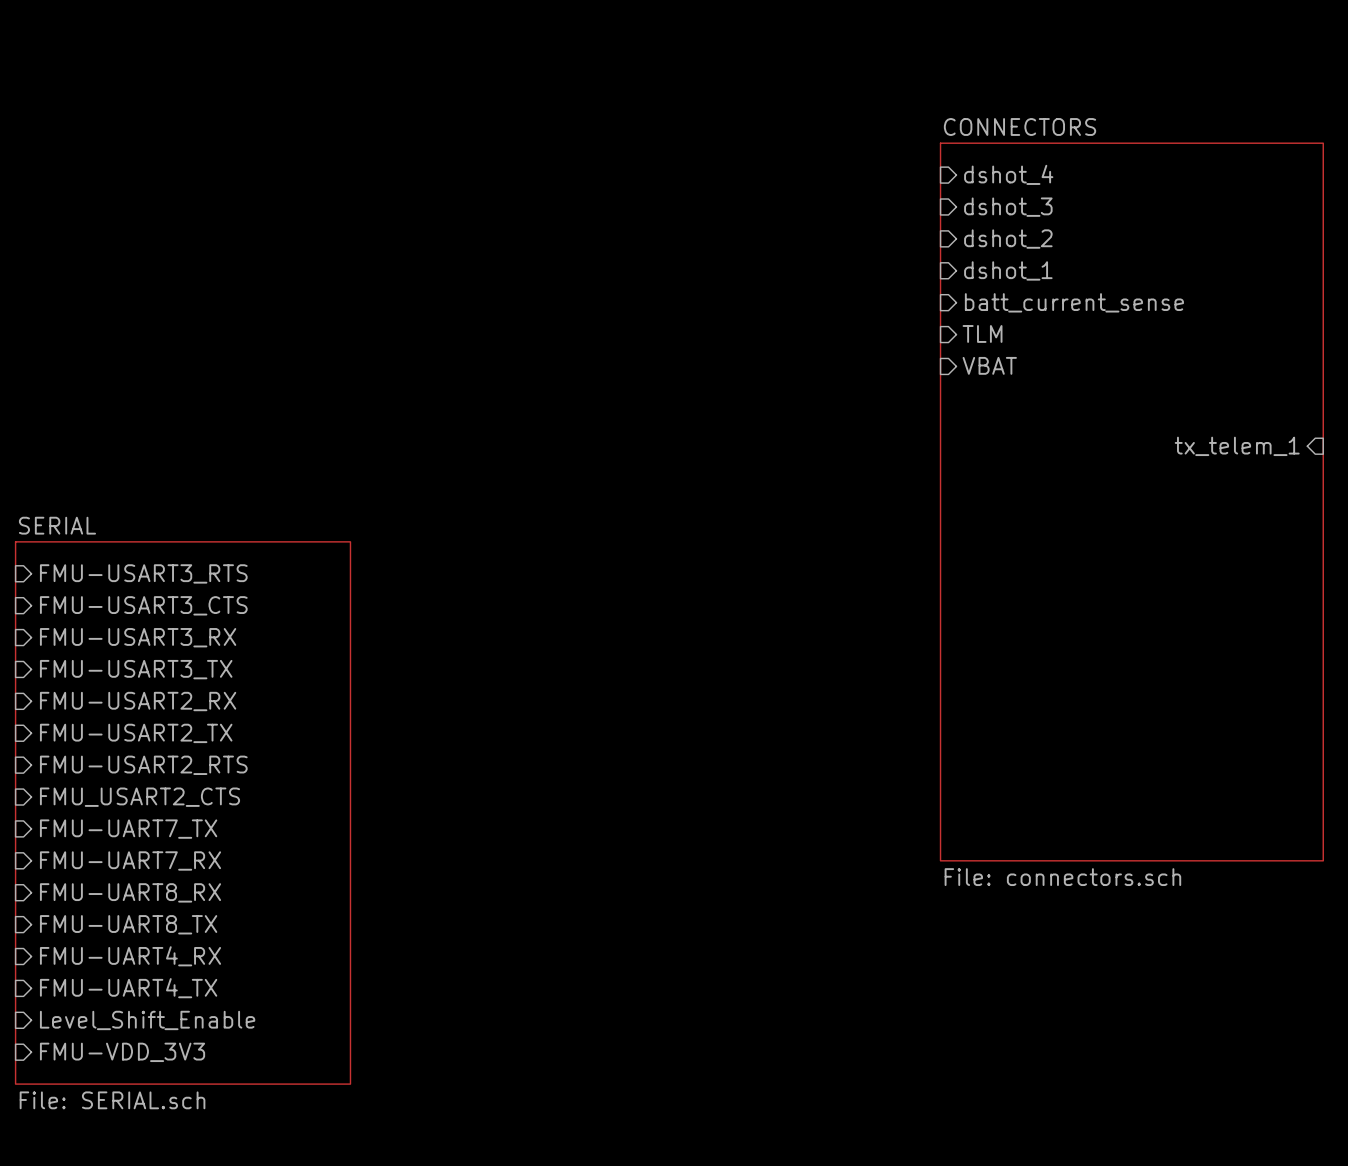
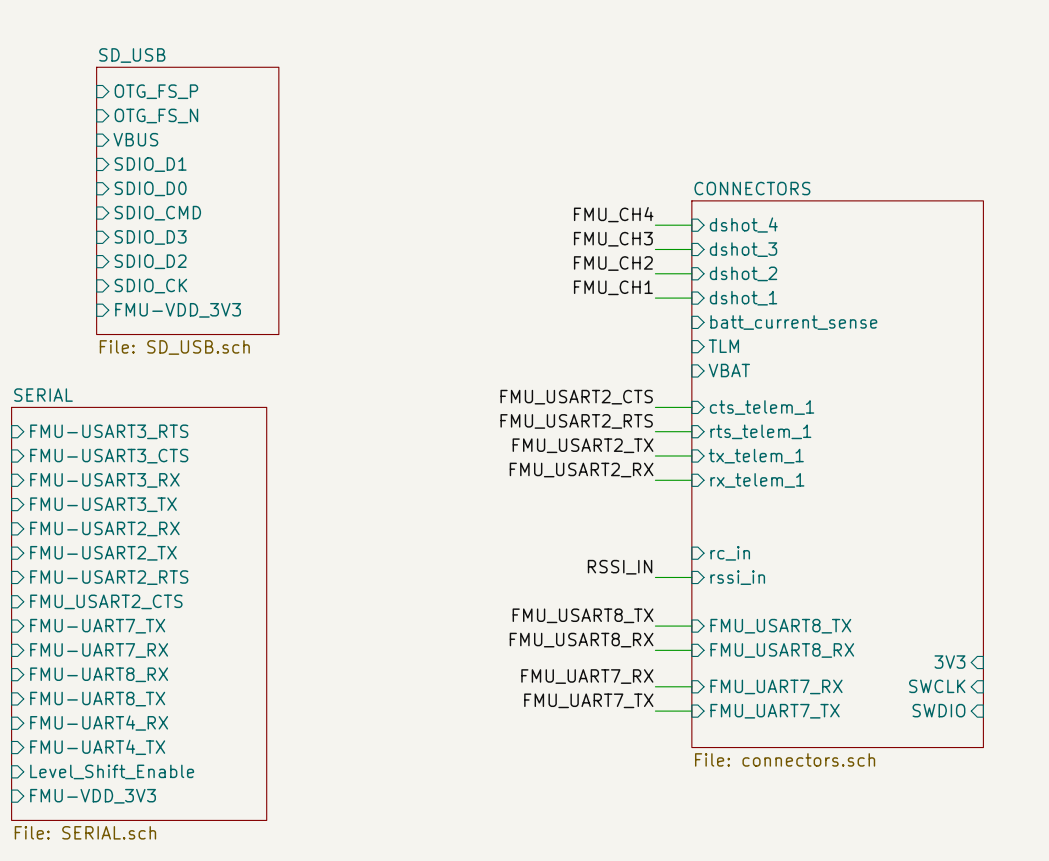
sheet pin: none -> OTG_FS_P (156, 91)
sheet pin: none -> OTG_FS_N (156, 115)
sheet pin position: dshot_4 (1008, 174) -> dshot_4 (743, 225)
sheet pin: none -> VBUS (135, 139)
sheet pin position: dshot_3 (1008, 207) -> dshot_3 (743, 249)
sheet pin: none -> SDIO_D1 (150, 164)
sheet pin position: dshot_2 (1008, 239) -> dshot_2 (743, 273)
sheet pin: none -> SDIO_D0 (150, 188)
sheet SD_USB: none -> File: SD_USB.sch (187, 200)
sheet pin position: dshot_1 (1008, 270) -> dshot_1 (743, 298)
sheet pin: none -> SDIO_CMD (157, 213)
label: none -> FMU_CH4 (613, 214)
wire: none -> (655, 225) (691, 225)
sheet pin position: batt_current_sense (1074, 302) -> batt_current_sense (793, 322)
sheet pin: none -> SDIO_D3 (150, 237)
label: none -> FMU_CH3 (613, 239)
sheet pin position: TLM (982, 333) -> TLM (723, 346)
wire: none -> (655, 249) (691, 249)
sheet pin: none -> SDIO_D2 (150, 261)
label: none -> FMU_CH2 (613, 263)
sheet pin position: VBAT (989, 365) -> VBAT (729, 370)
wire: none -> (655, 273) (691, 273)
sheet pin: none -> SDIO_CK (150, 286)
label: none -> FMU_CH1 (613, 287)
wire: none -> (655, 298) (691, 298)
sheet pin: none -> FMU-VDD_3V3 (178, 310)
sheet pin: tx_telem_1 (1237, 446) -> none
sheet CONNECTORS position: (1131, 502) -> (837, 474)
label: none -> FMU_USART2_CTS (576, 397)
wire: none -> (655, 407) (691, 407)
sheet pin: none -> cts_telem_1 (762, 407)
label: none -> FMU_USART2_RTS (576, 421)
wire: none -> (655, 431) (691, 431)
sheet pin: none -> rts_telem_1 (760, 431)
label: none -> FMU_USART2_TX (583, 445)
wire: none -> (655, 455) (691, 455)
sheet pin: none -> tx_telem_1 (756, 456)
label: none -> FMU_USART2_RX (581, 470)
wire: none -> (655, 480) (691, 480)
sheet pin: none -> rx_telem_1 (757, 480)
sheet pin: none -> rc_in (730, 553)
label: none -> RSSI_IN (620, 567)
wire: none -> (655, 577) (691, 577)
sheet pin: none -> rssi_in (737, 577)
label: none -> FMU_USART8_TX (583, 615)
wire: none -> (655, 626) (691, 626)
sheet pin: none -> FMU_USART8_TX (780, 626)
label: none -> FMU_USART8_RX (581, 640)
wire: none -> (655, 650) (691, 650)
sheet pin: none -> FMU_USART8_RX (782, 650)
sheet pin: none -> 3V3 (949, 662)
label: none -> FMU_UART7_RX (587, 676)
wire: none -> (655, 686) (691, 686)
sheet pin: none -> FMU_UART7_RX (776, 686)
sheet pin: none -> SWCLK (937, 686)
label: none -> FMU_UART7_TX (588, 700)
sheet pin: none -> SWDIO (938, 710)
wire: none -> (655, 711) (691, 711)
sheet pin: none -> FMU_UART7_TX (775, 711)

